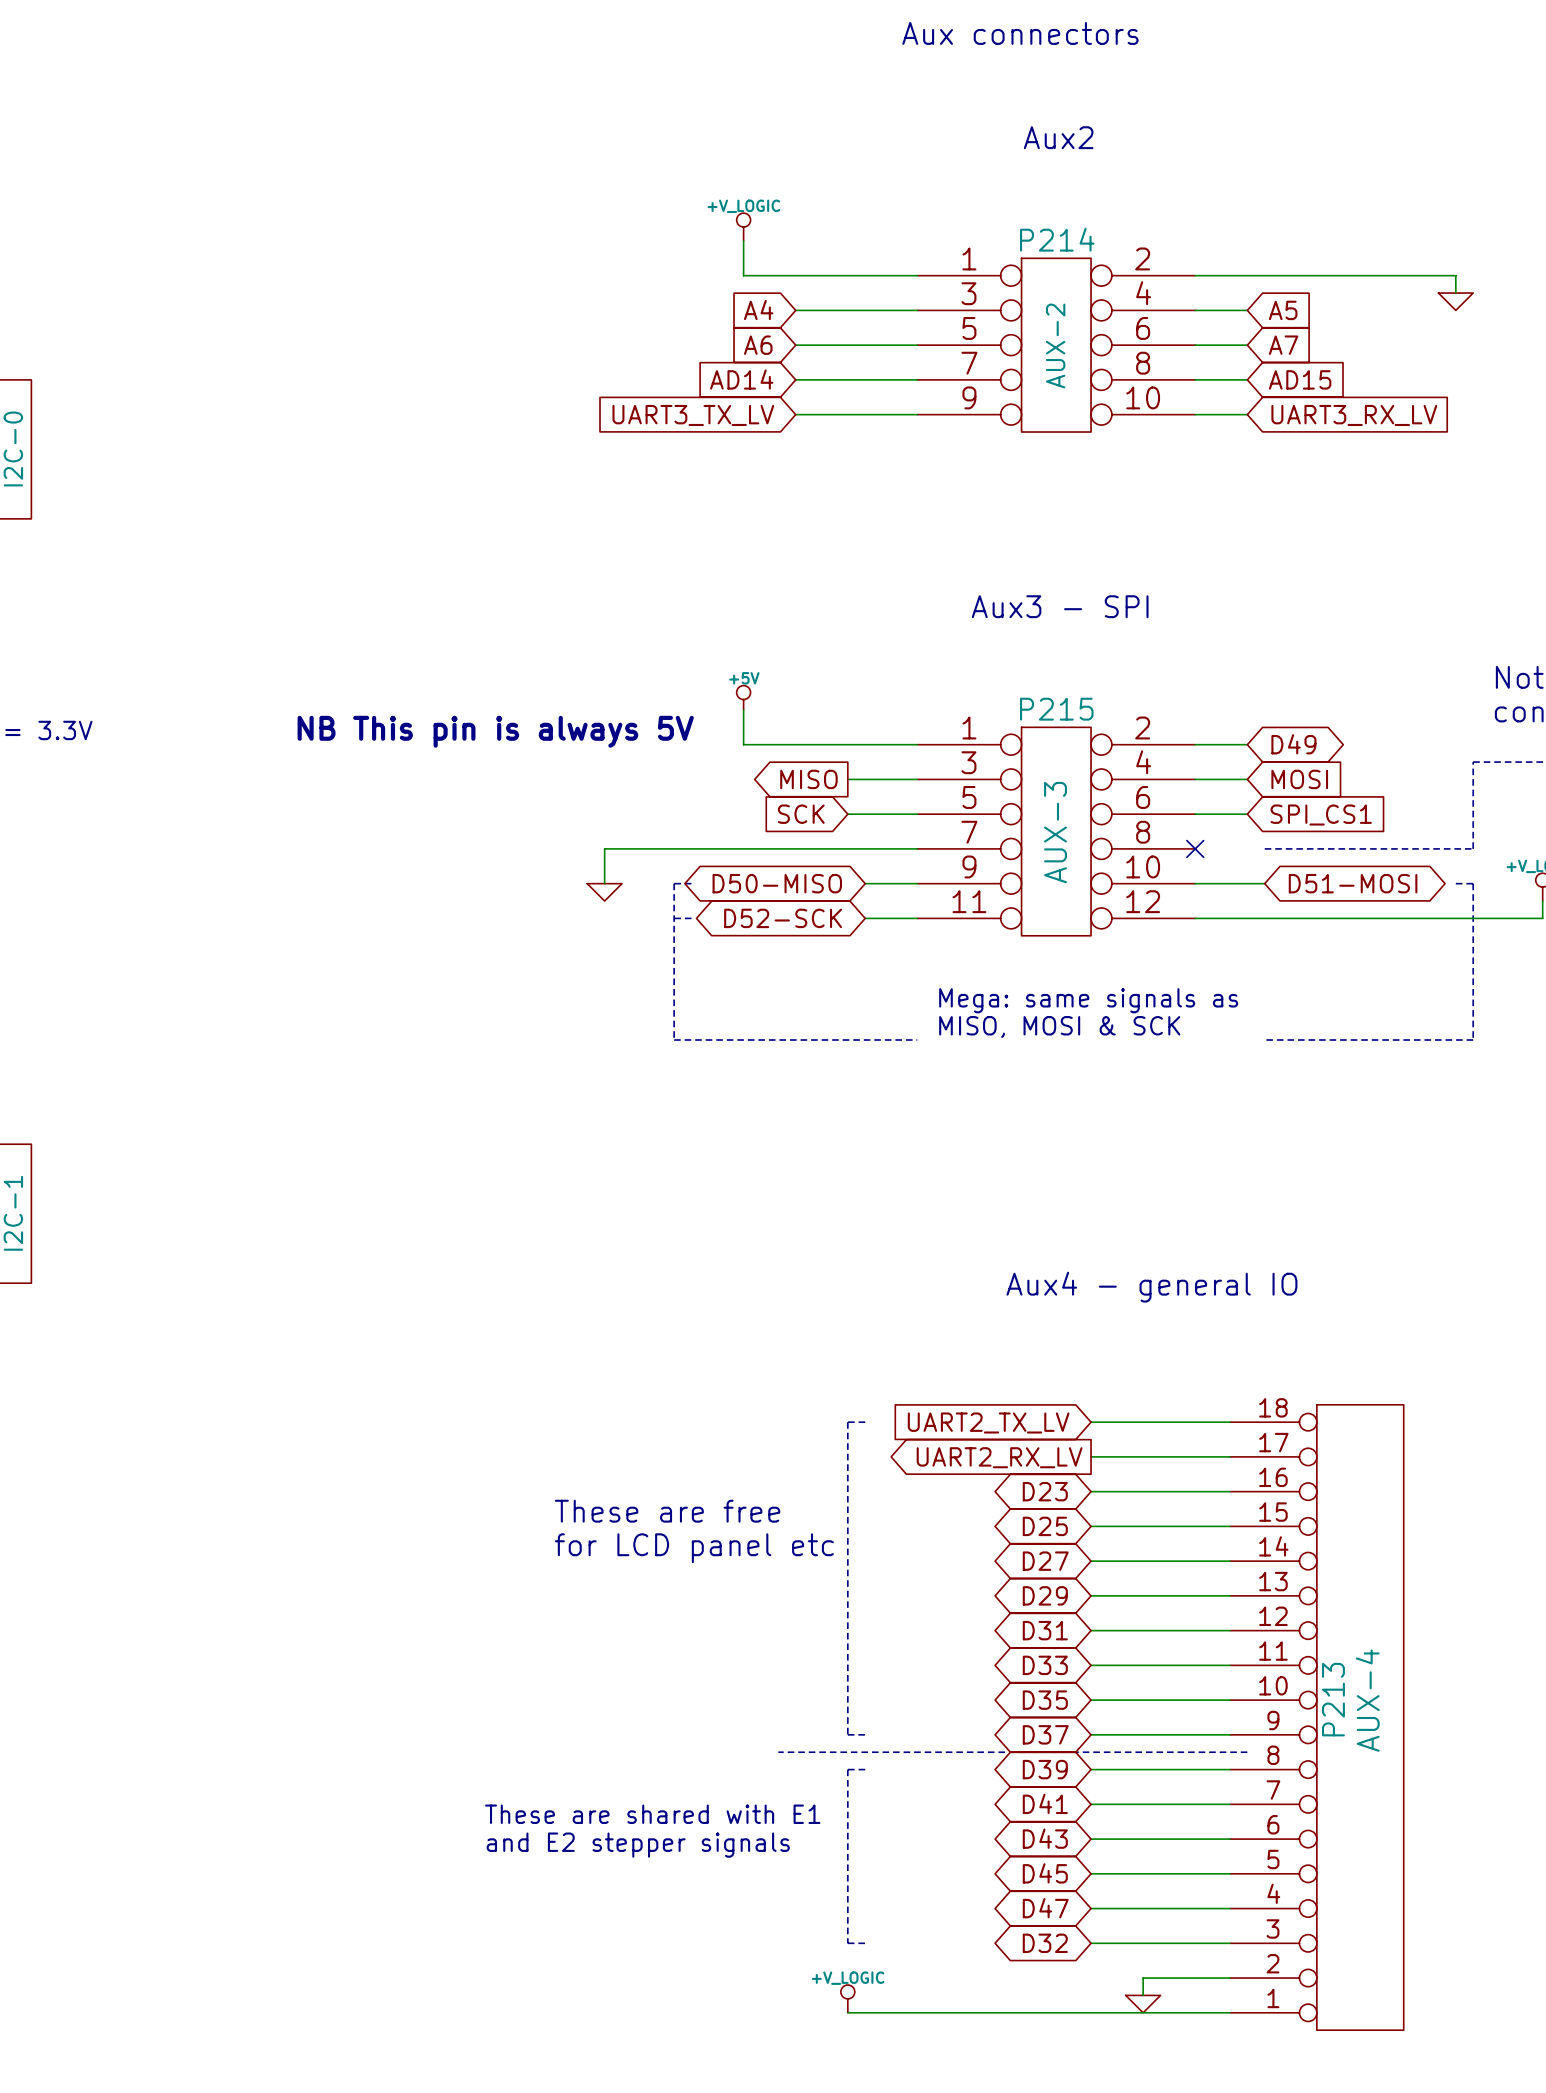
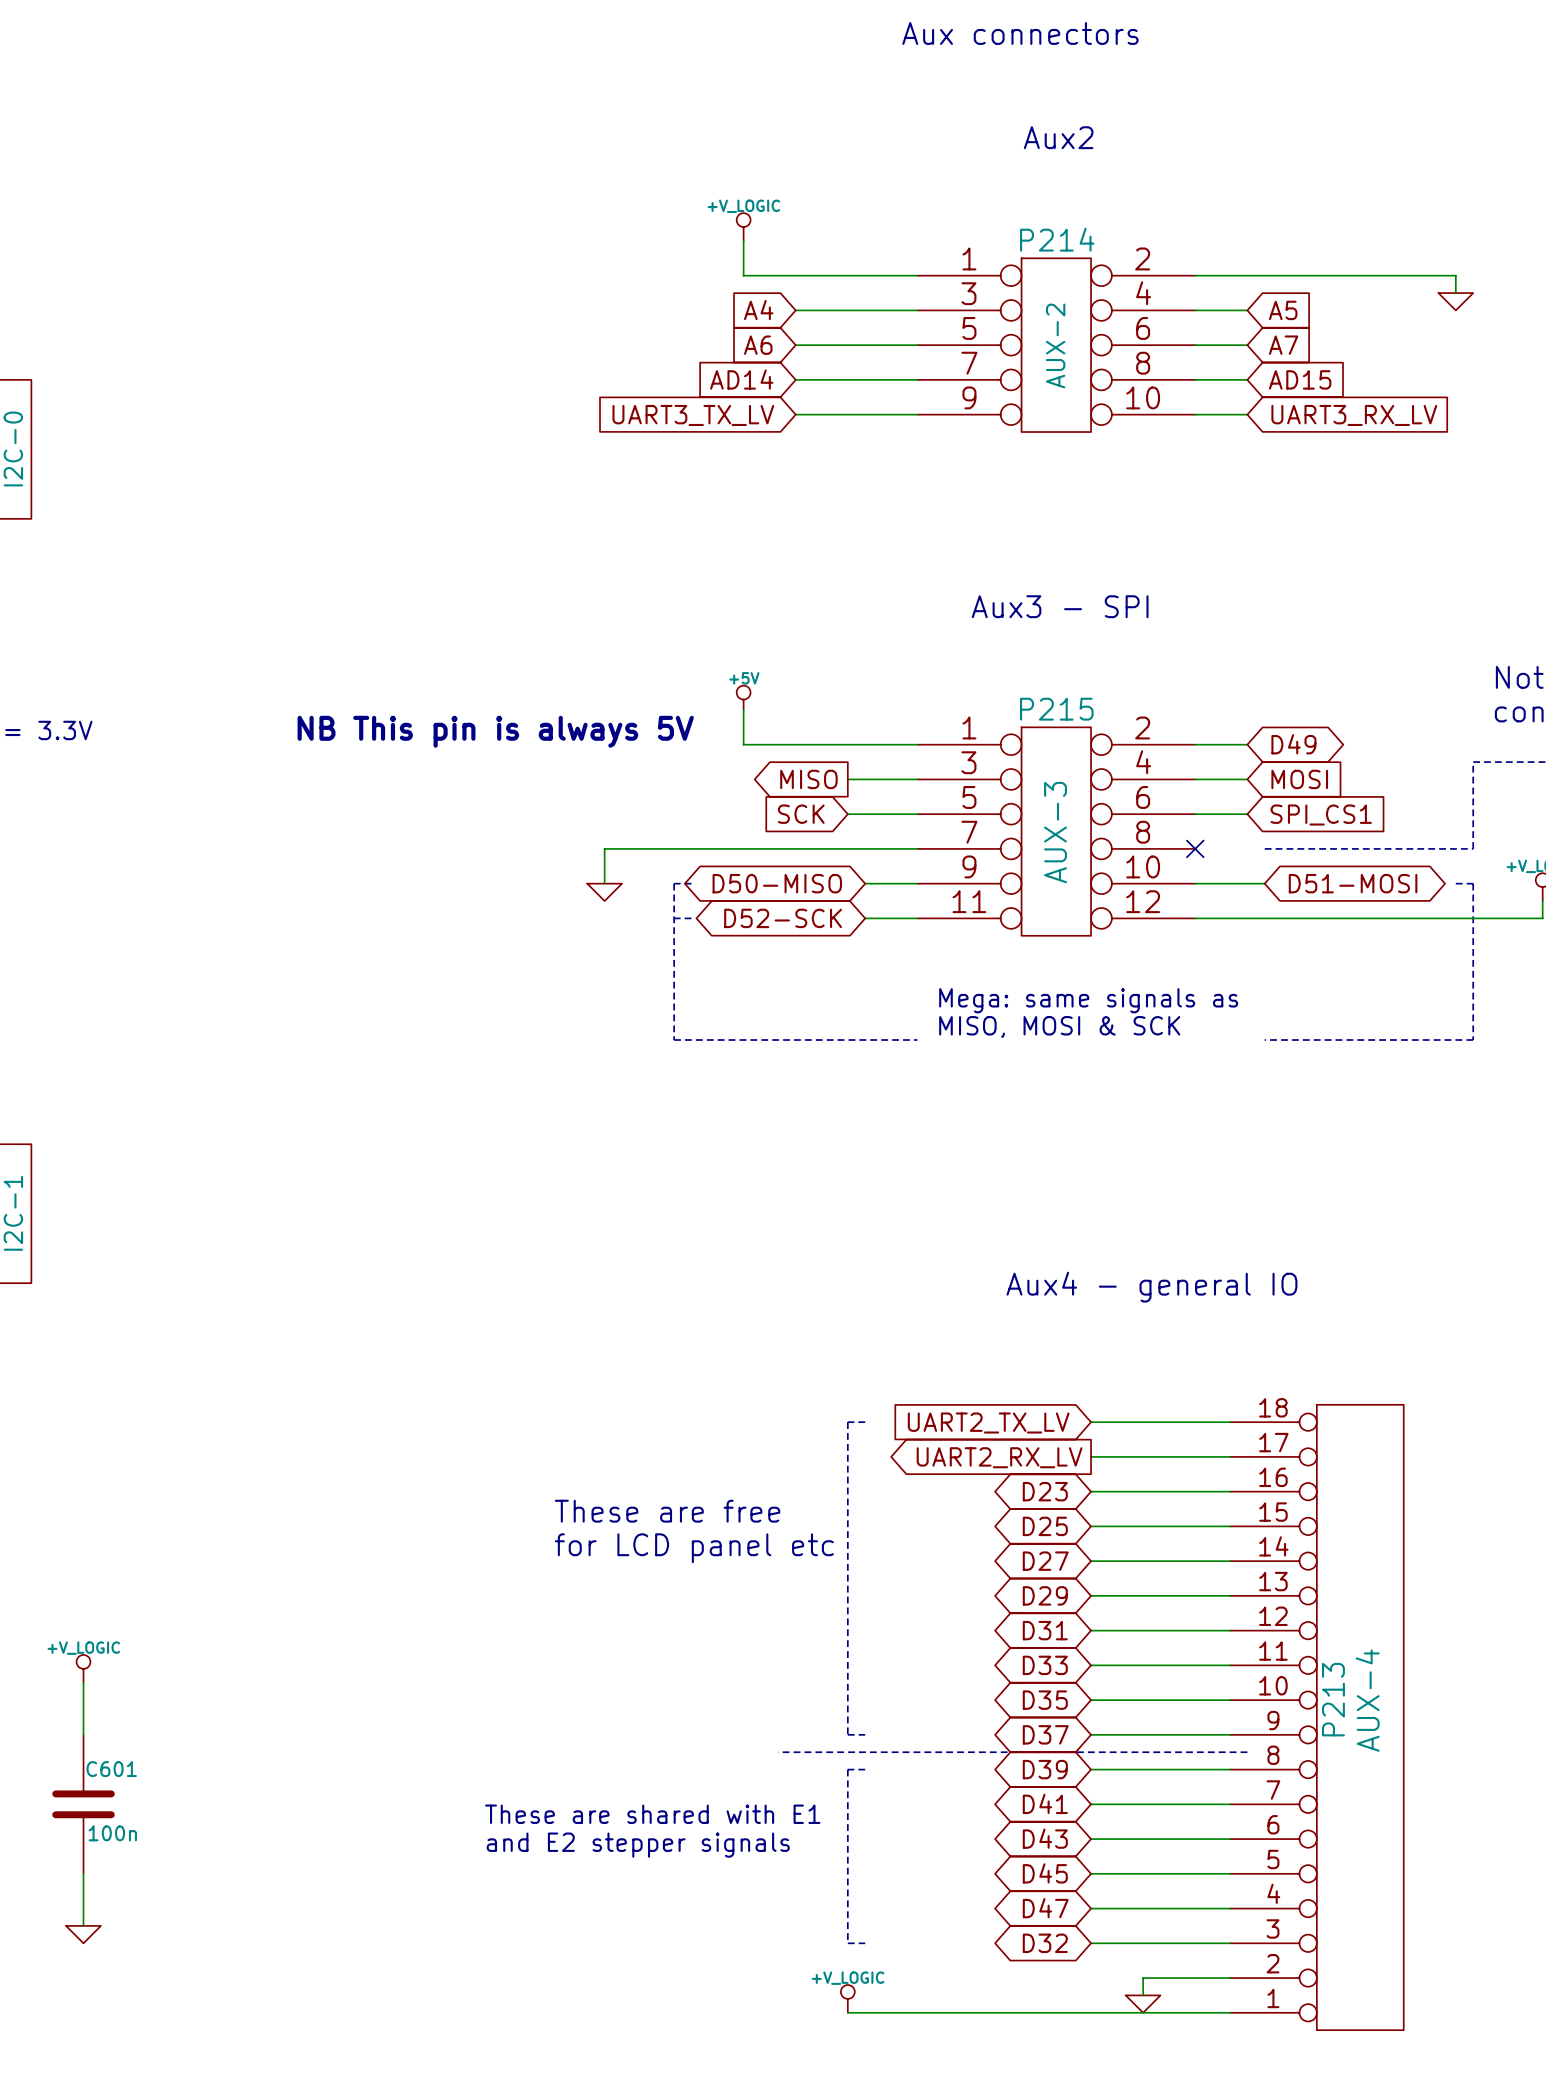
power symbol: none -> +V_LOGIC (83, 1668)
wire: none -> (83, 1682) (83, 1734)
C601: none -> 100n (83, 1804)
wire: none -> (83, 1873) (83, 1925)
power symbol: none -> (83, 1934)

